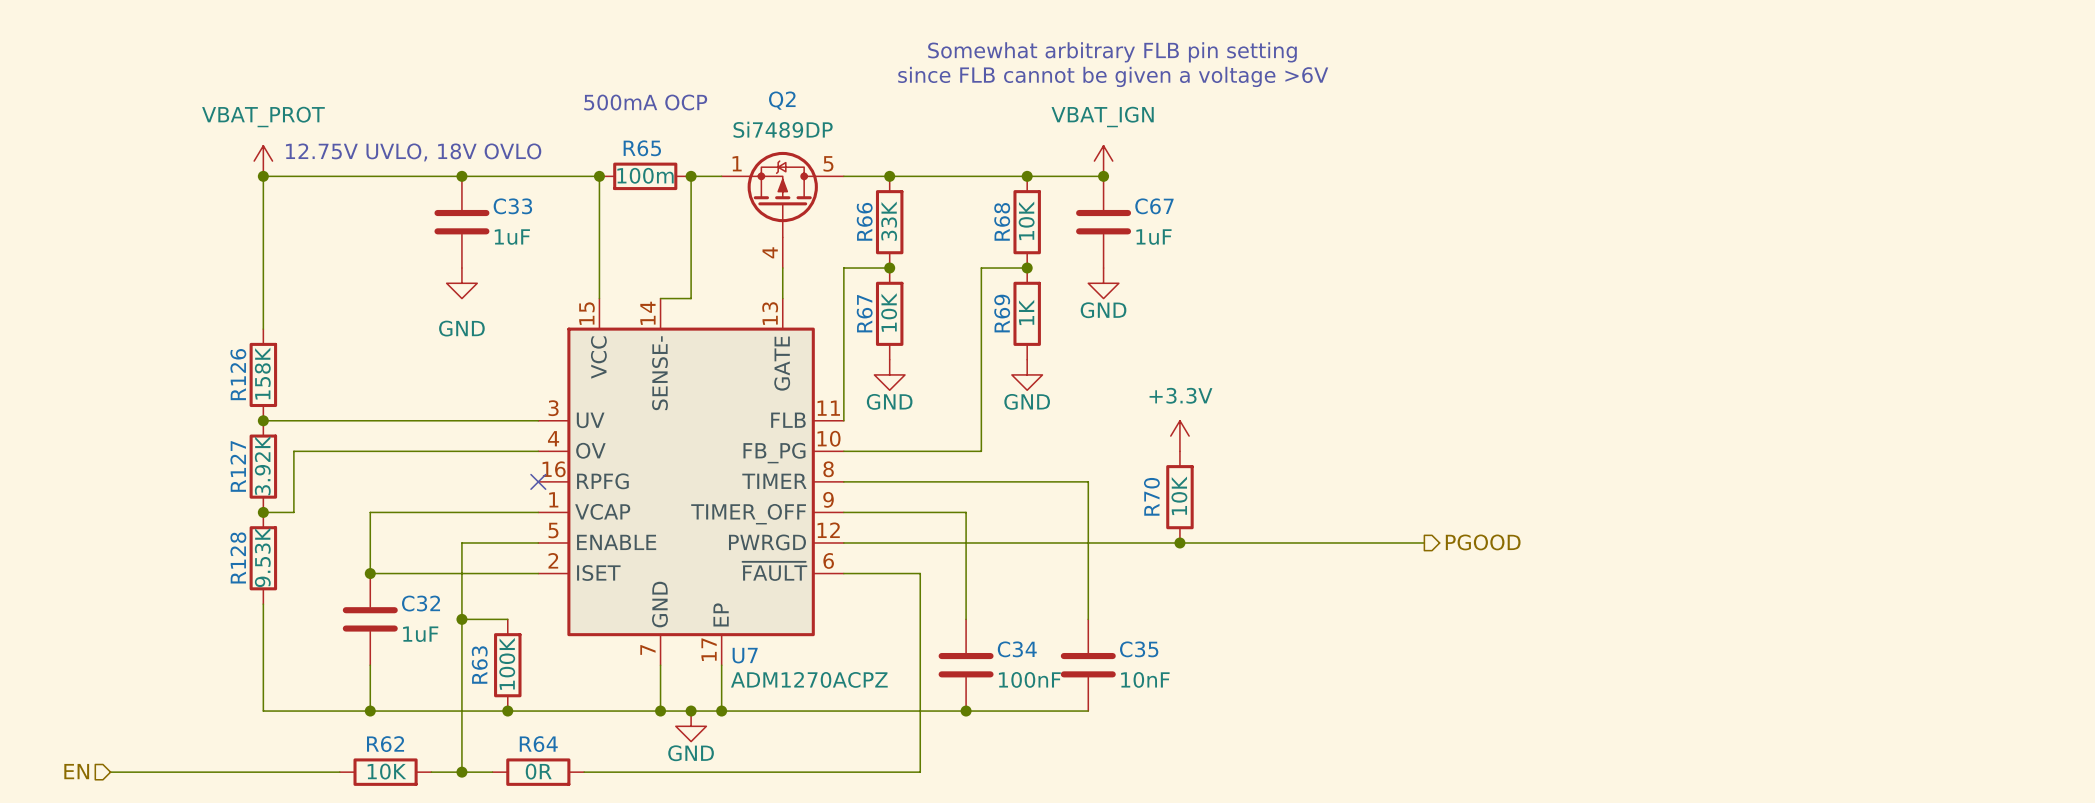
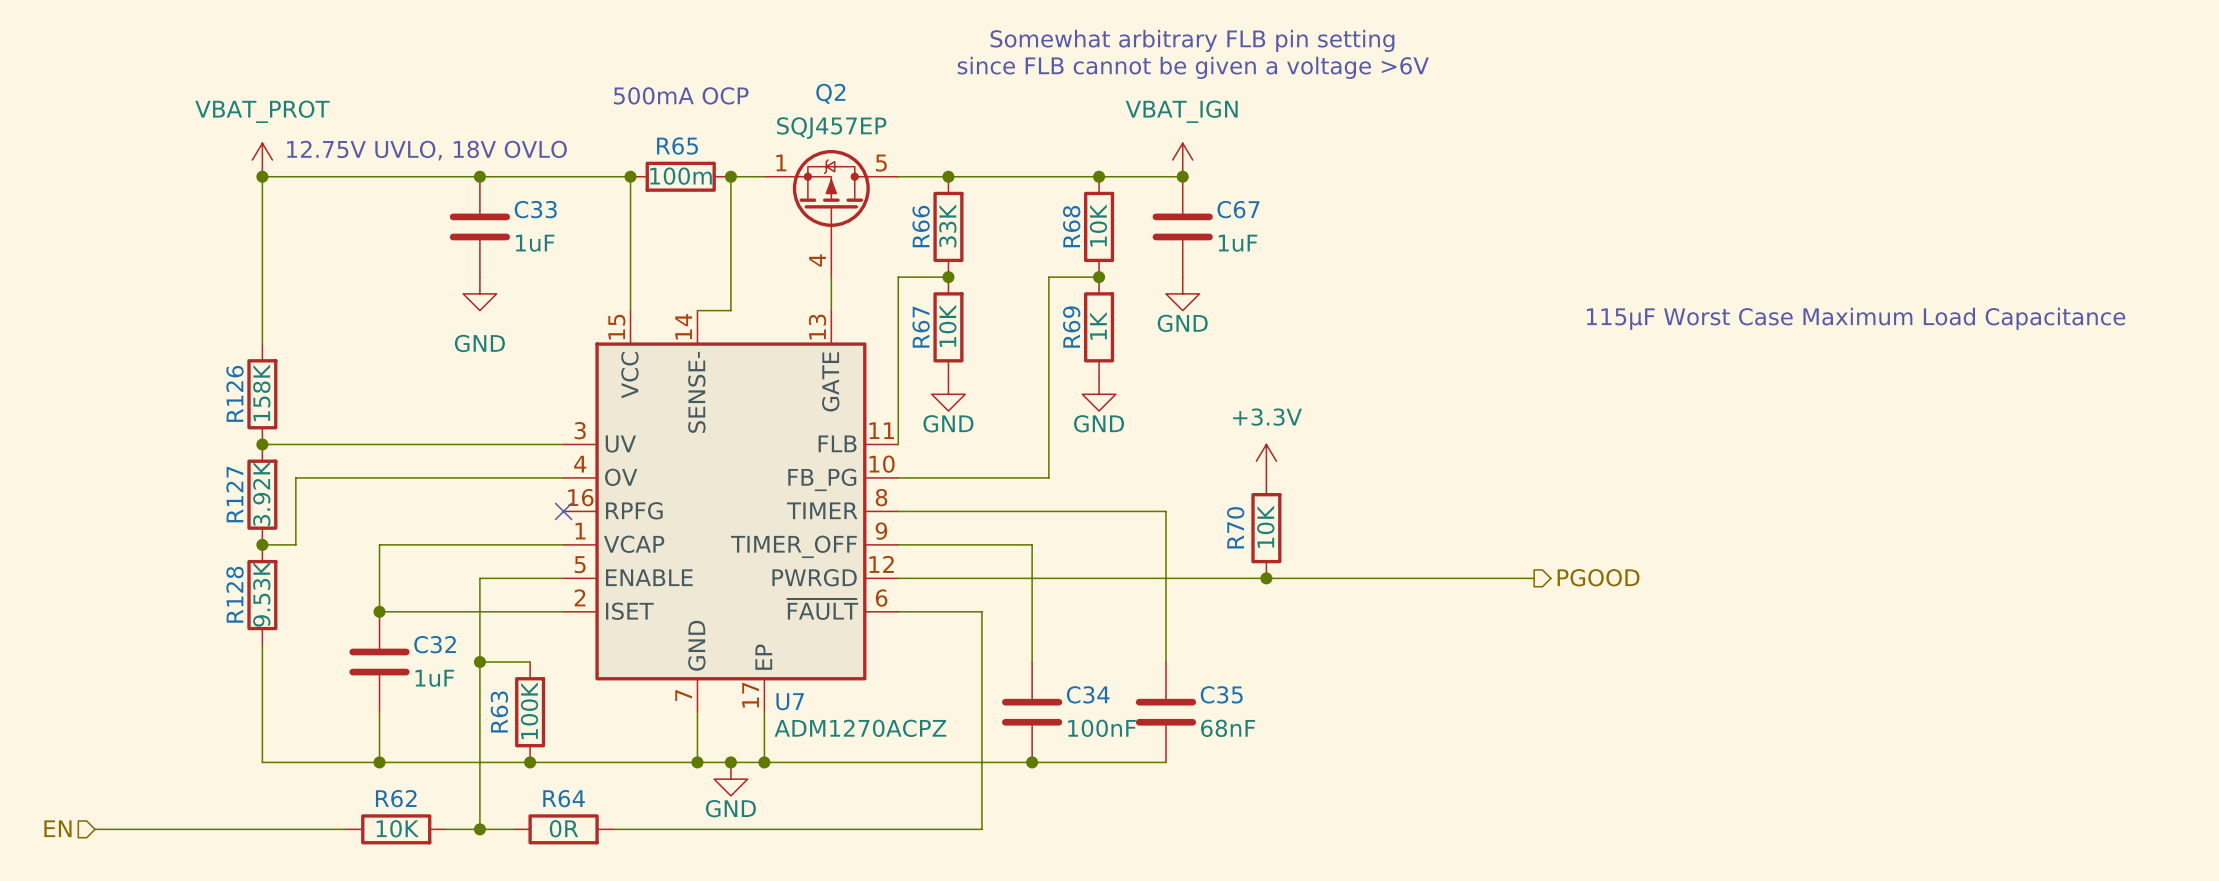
Q2 value: Si7489DP (783, 129) -> SQJ457EP (831, 128)
text: none -> 115μF Worst Case Maximum Load Capacitance (1856, 318)
C35 value: 10nF (1145, 679) -> 68nF (1228, 728)

